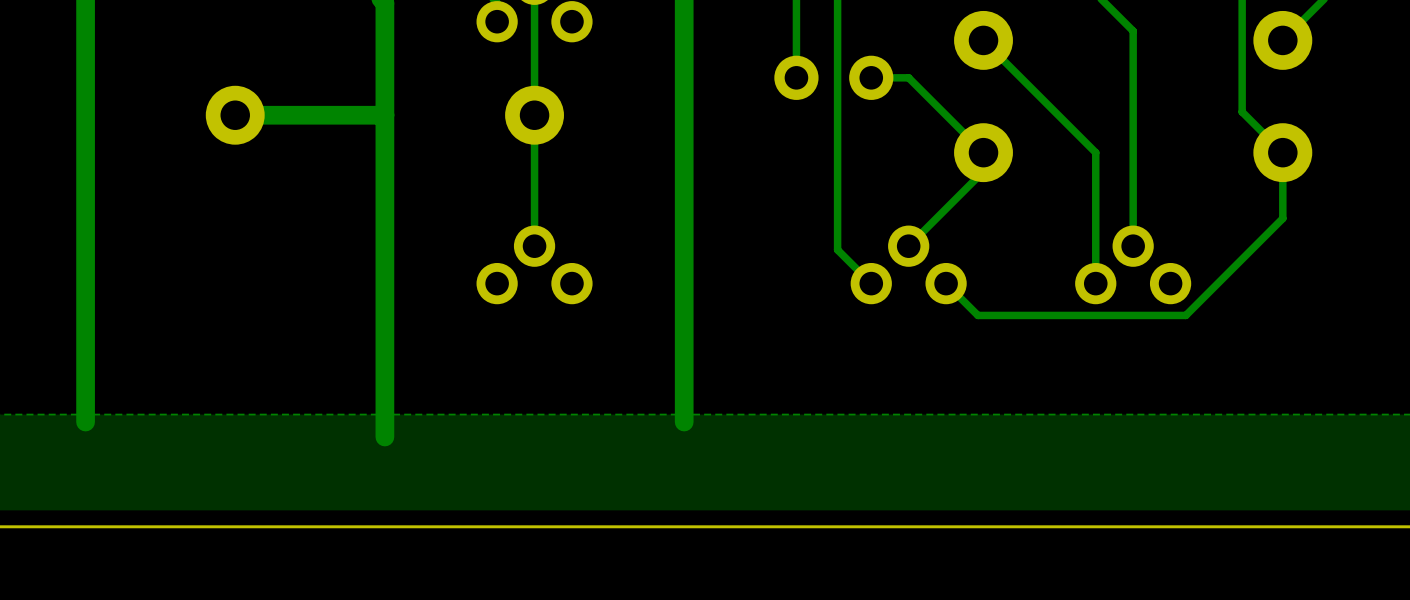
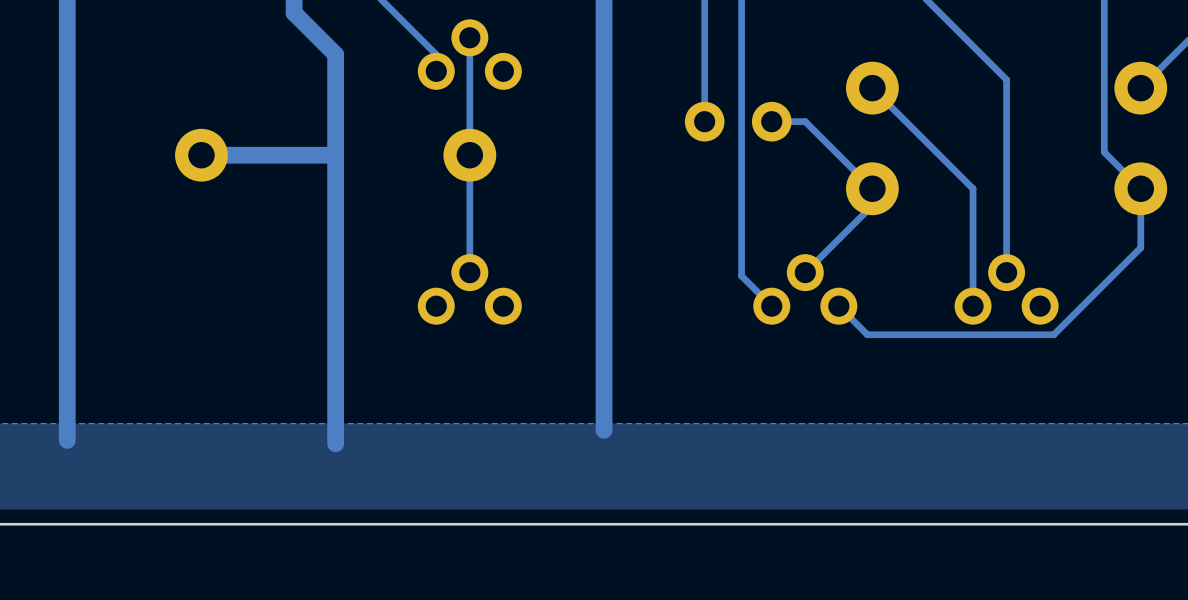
track: none -> (67, 430) (67, 440)

